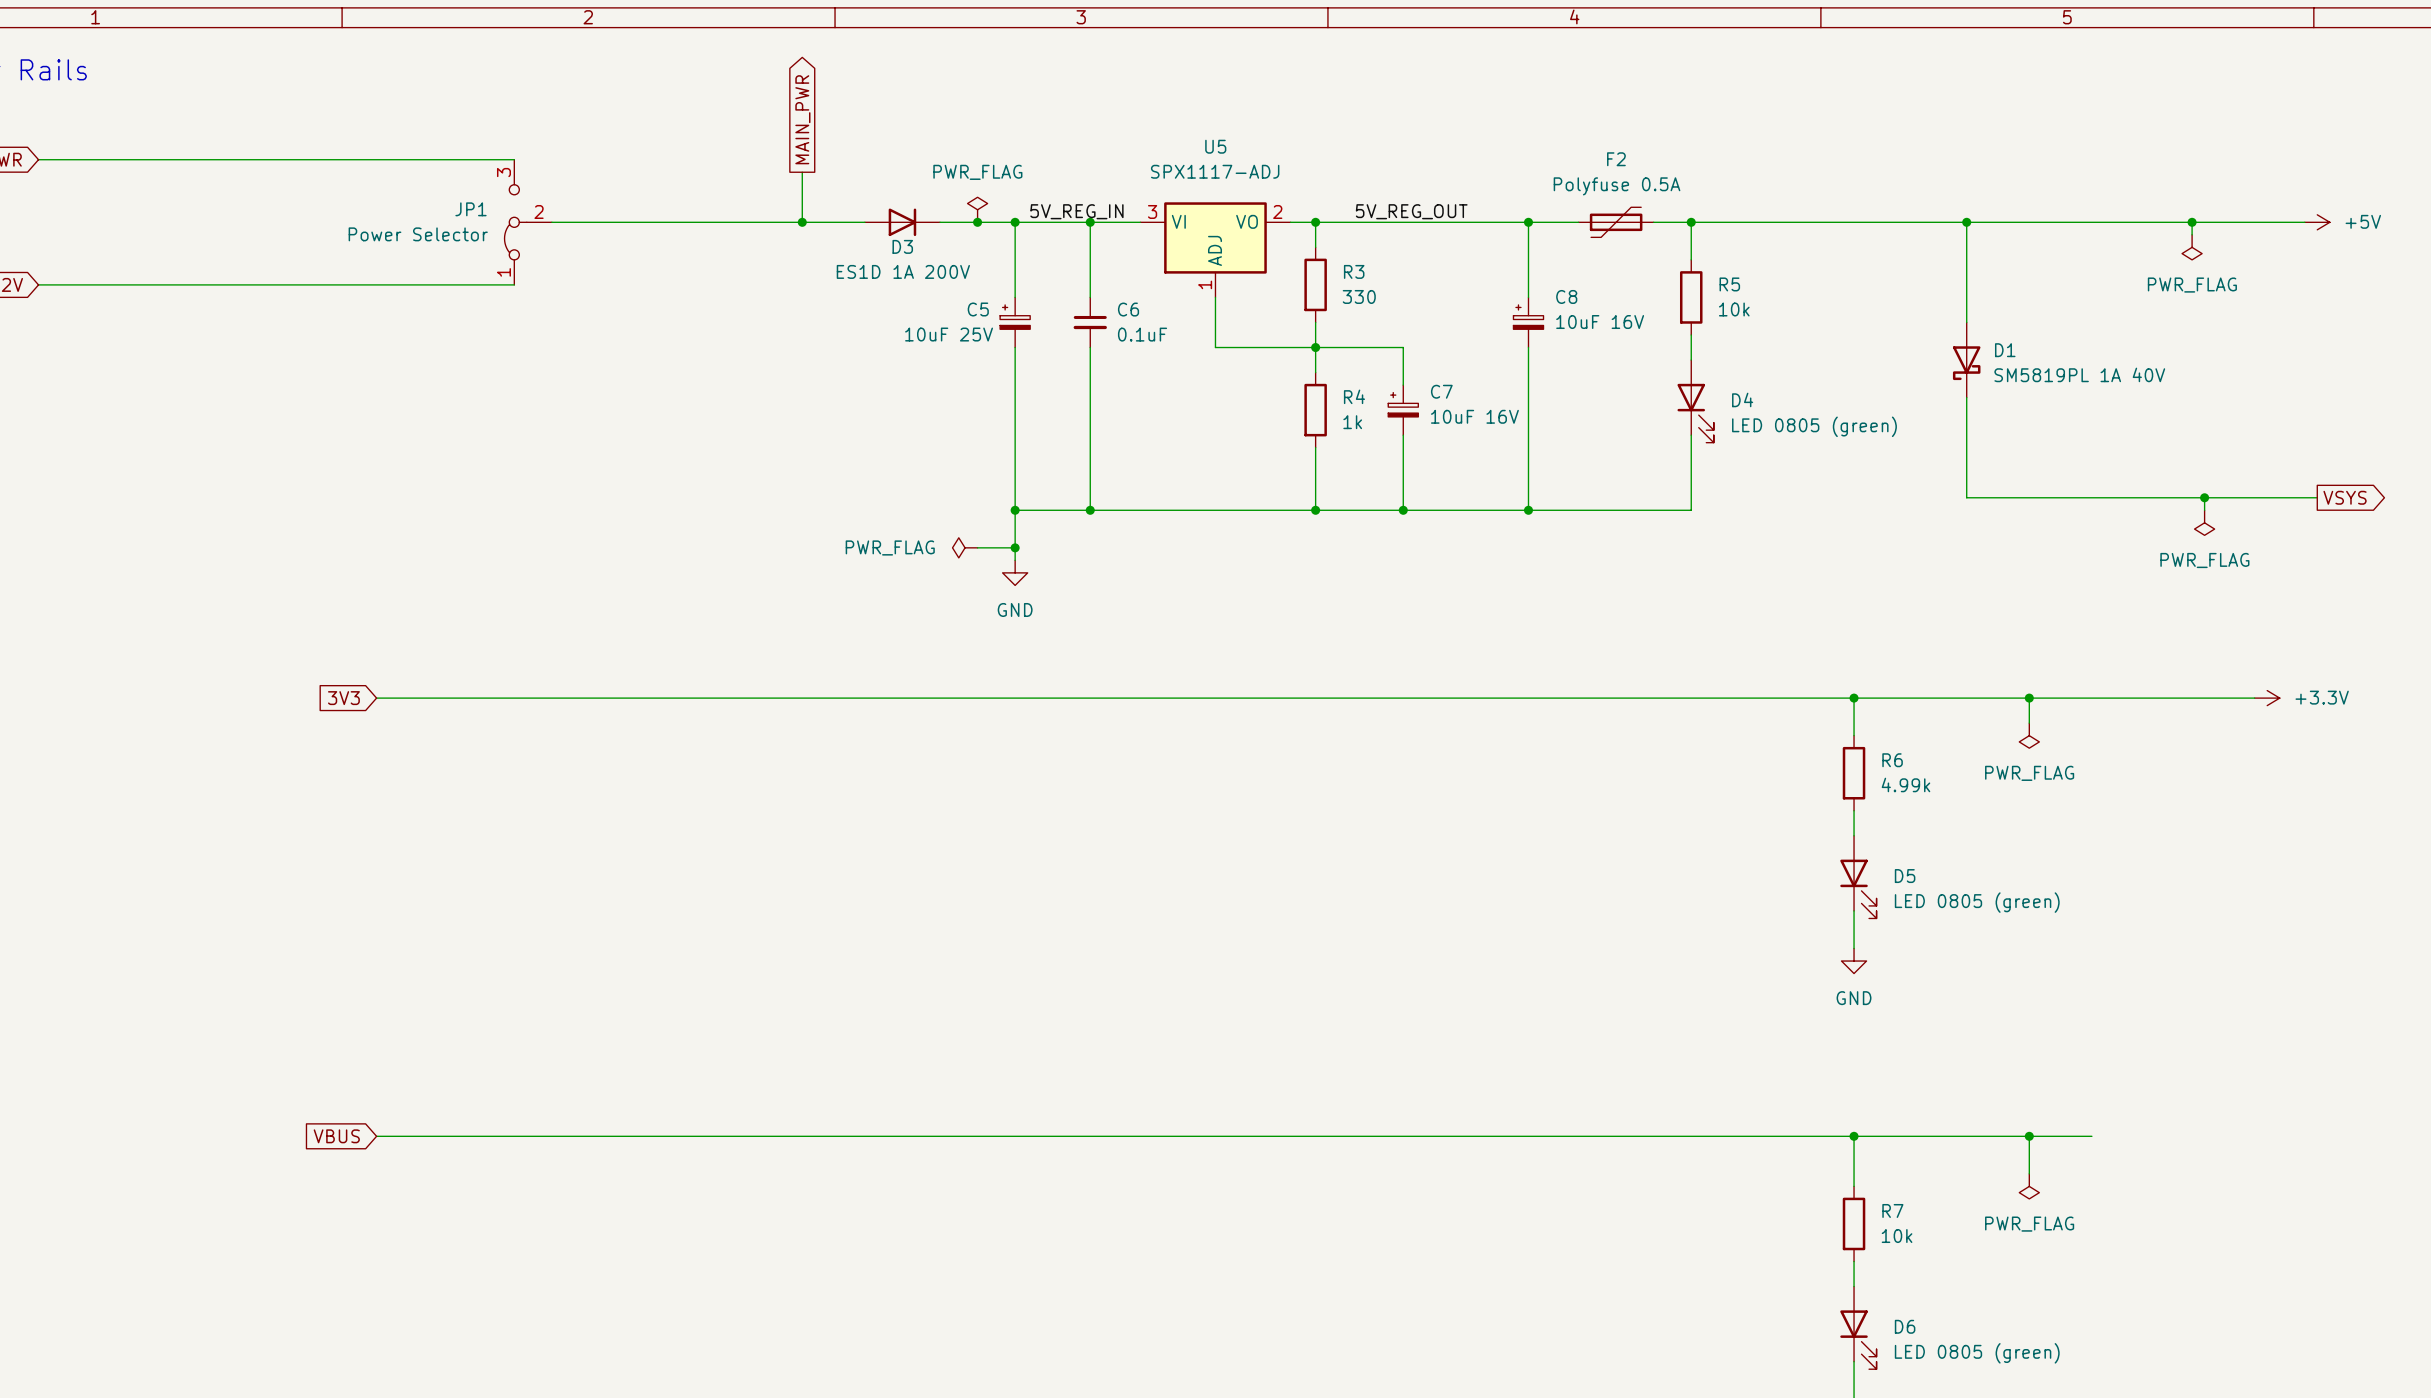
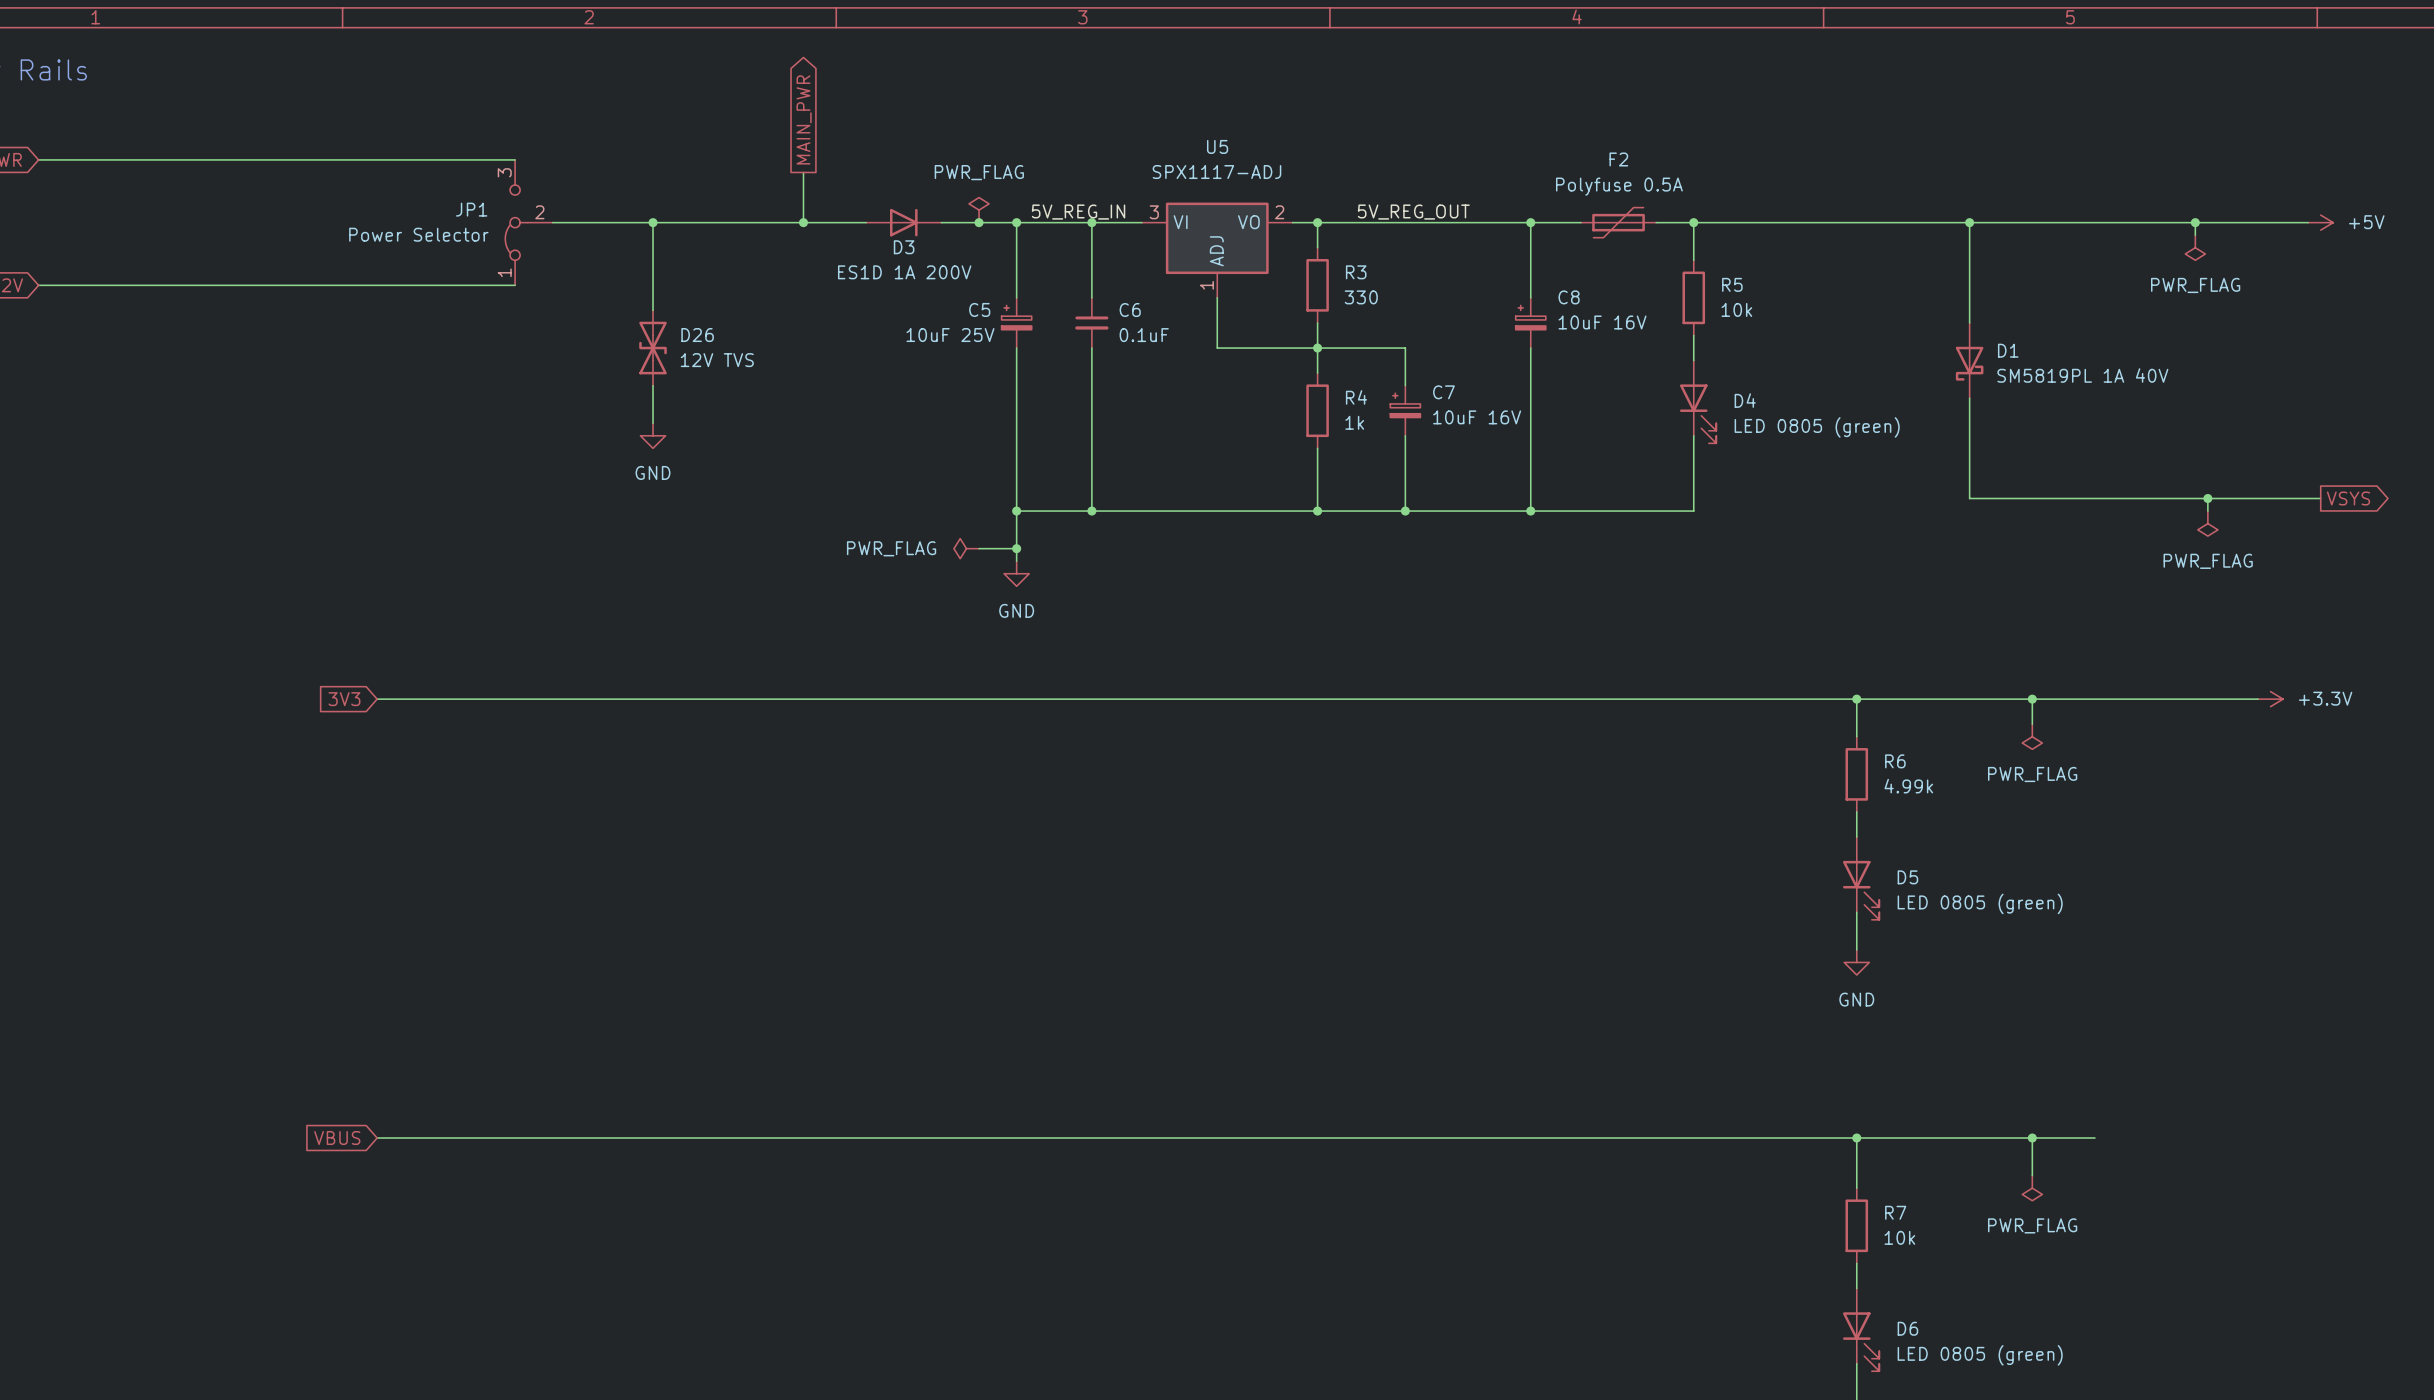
wire: none -> (653, 222) (653, 310)
junction: none -> (653, 222)
D26: none -> 12V TVS (653, 348)
wire: none -> (653, 385) (653, 423)
power symbol: none -> GND (653, 435)

